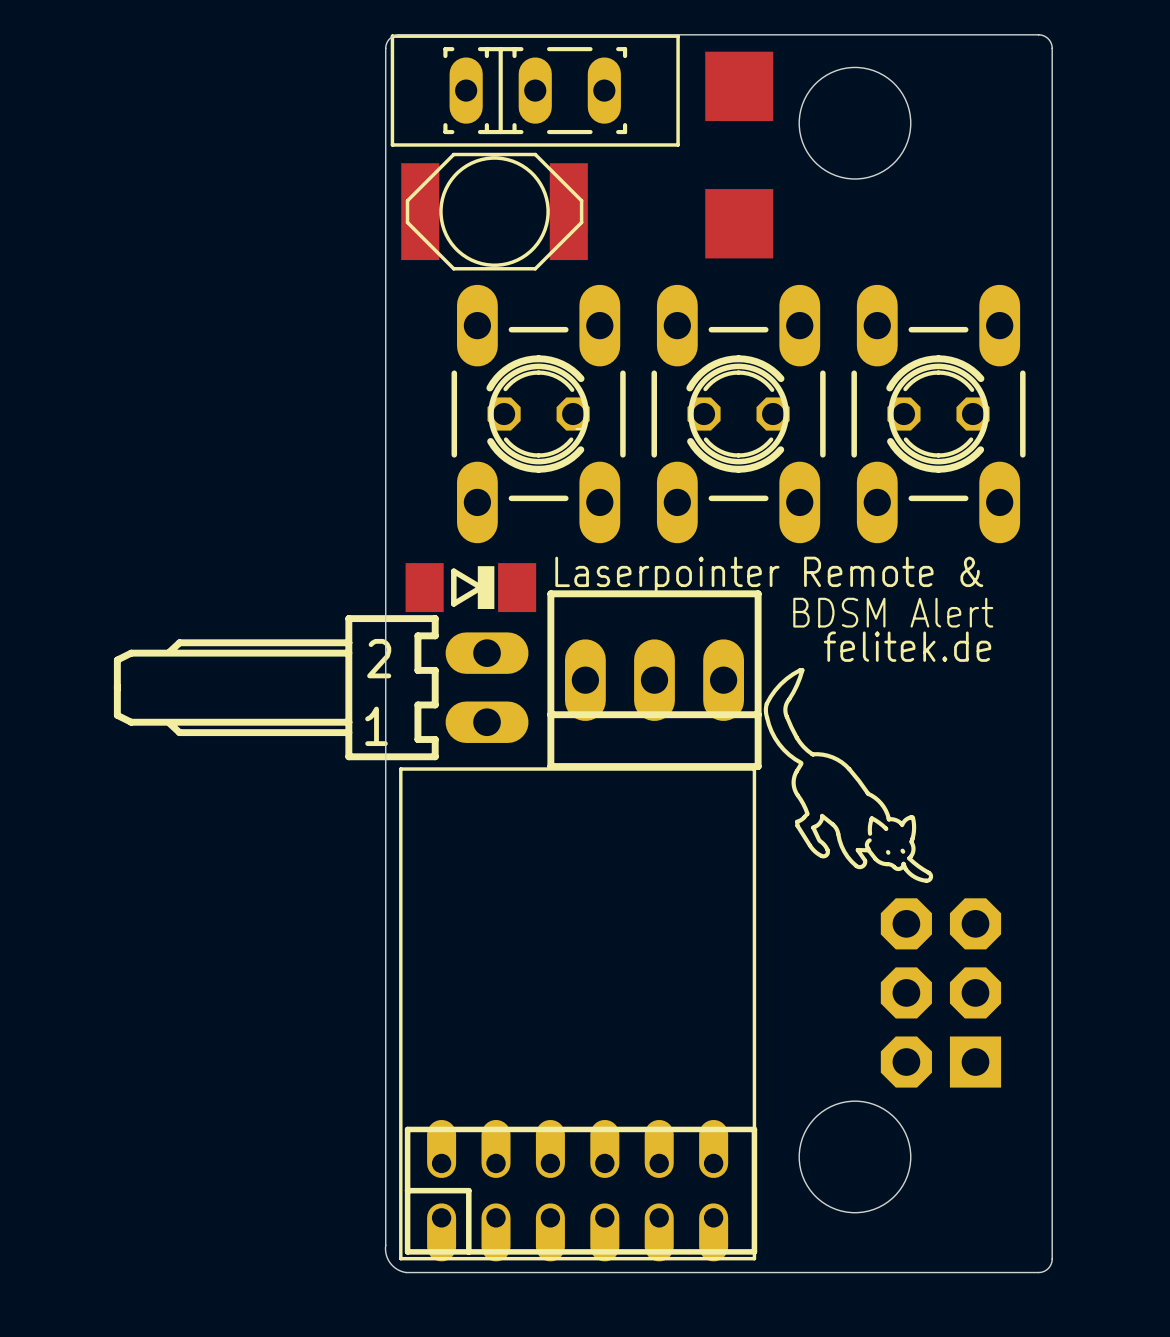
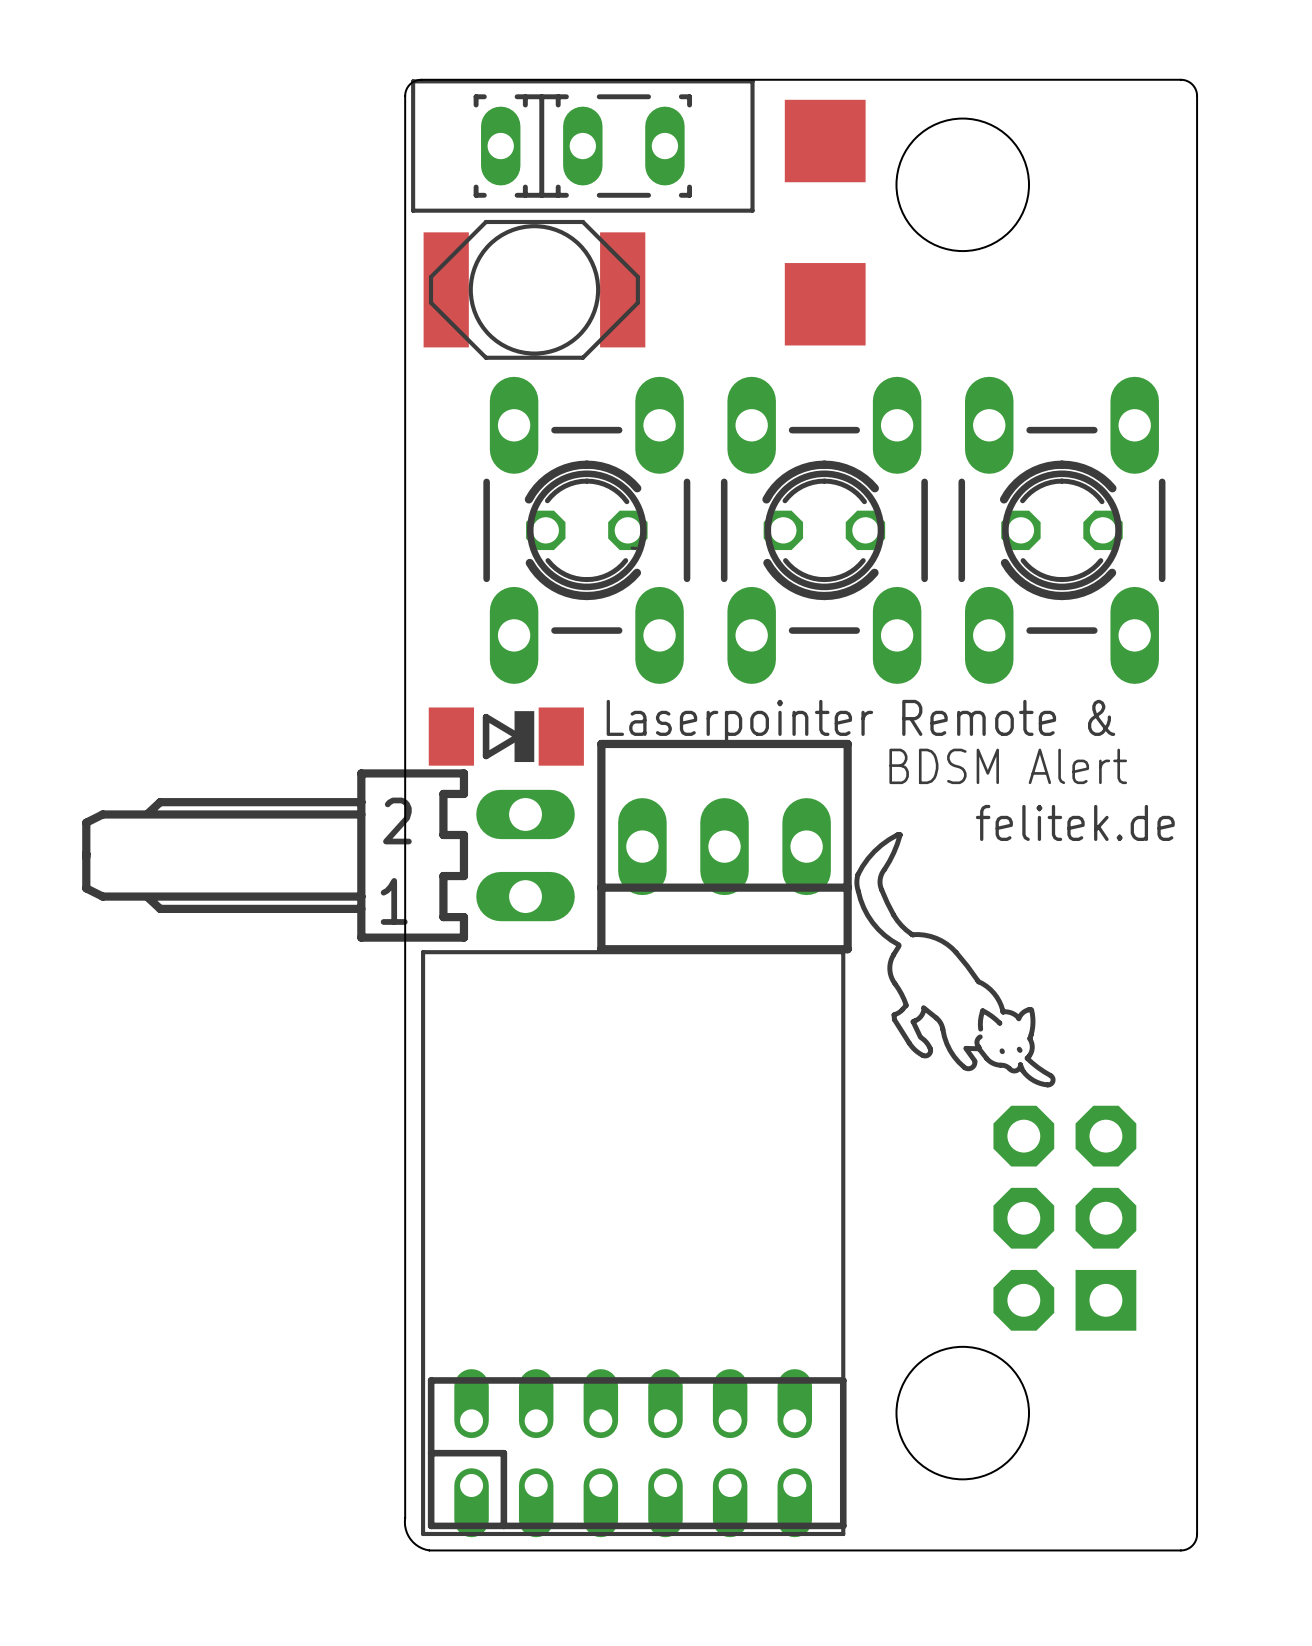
text position: felitek.de (907, 646) -> felitek.de (1075, 822)

